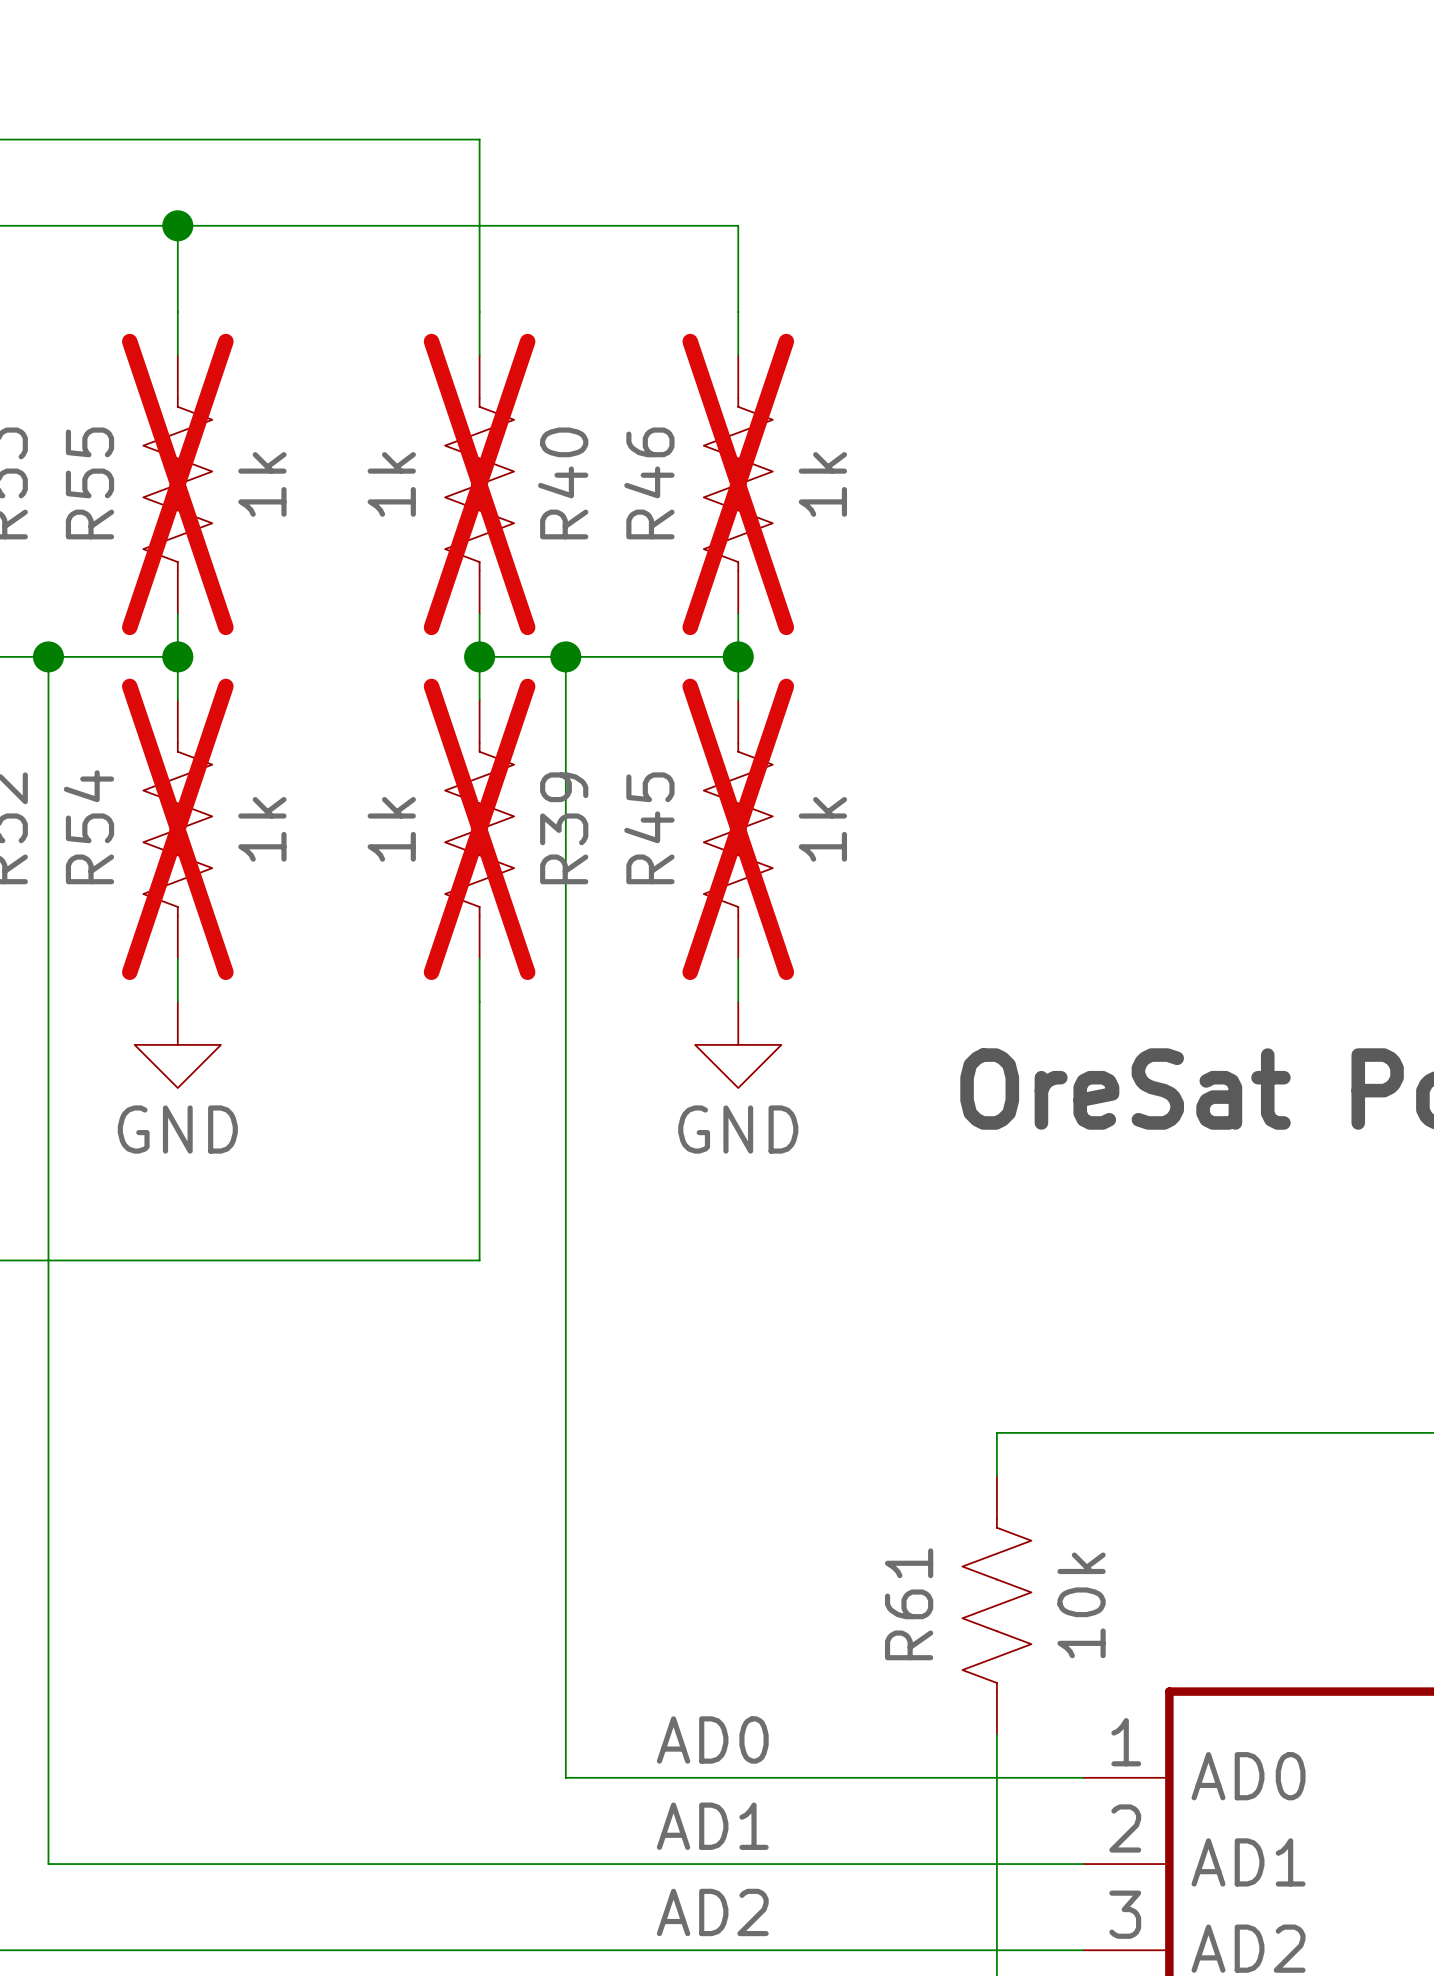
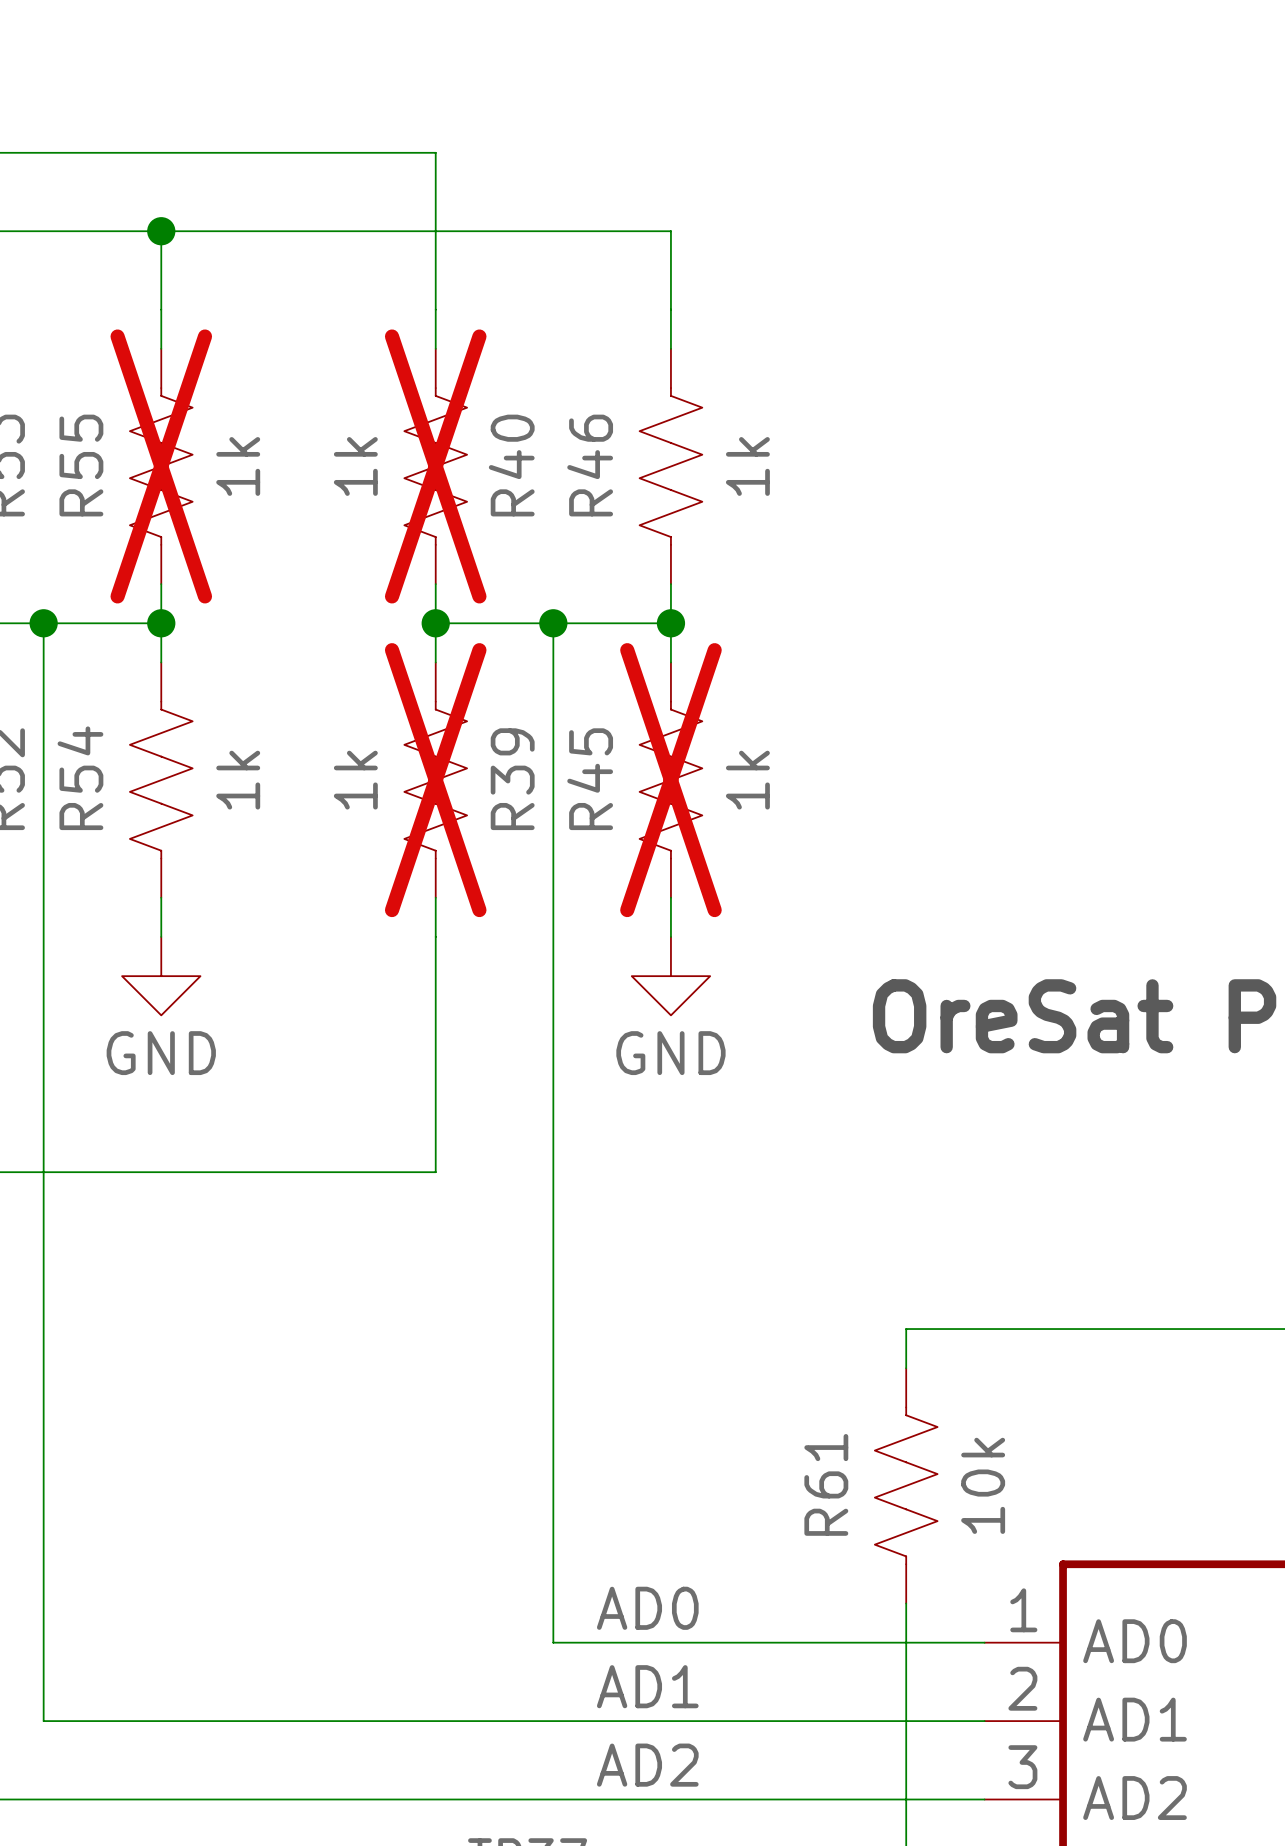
R46 do-not-place cross: (738, 484) -> none
wire: (565, 656) (565, 1777) (608, 1777) -> (553, 623) (553, 1642)
junction position: (565, 656) -> (553, 623)
R54 do-not-place cross: (177, 829) -> none

